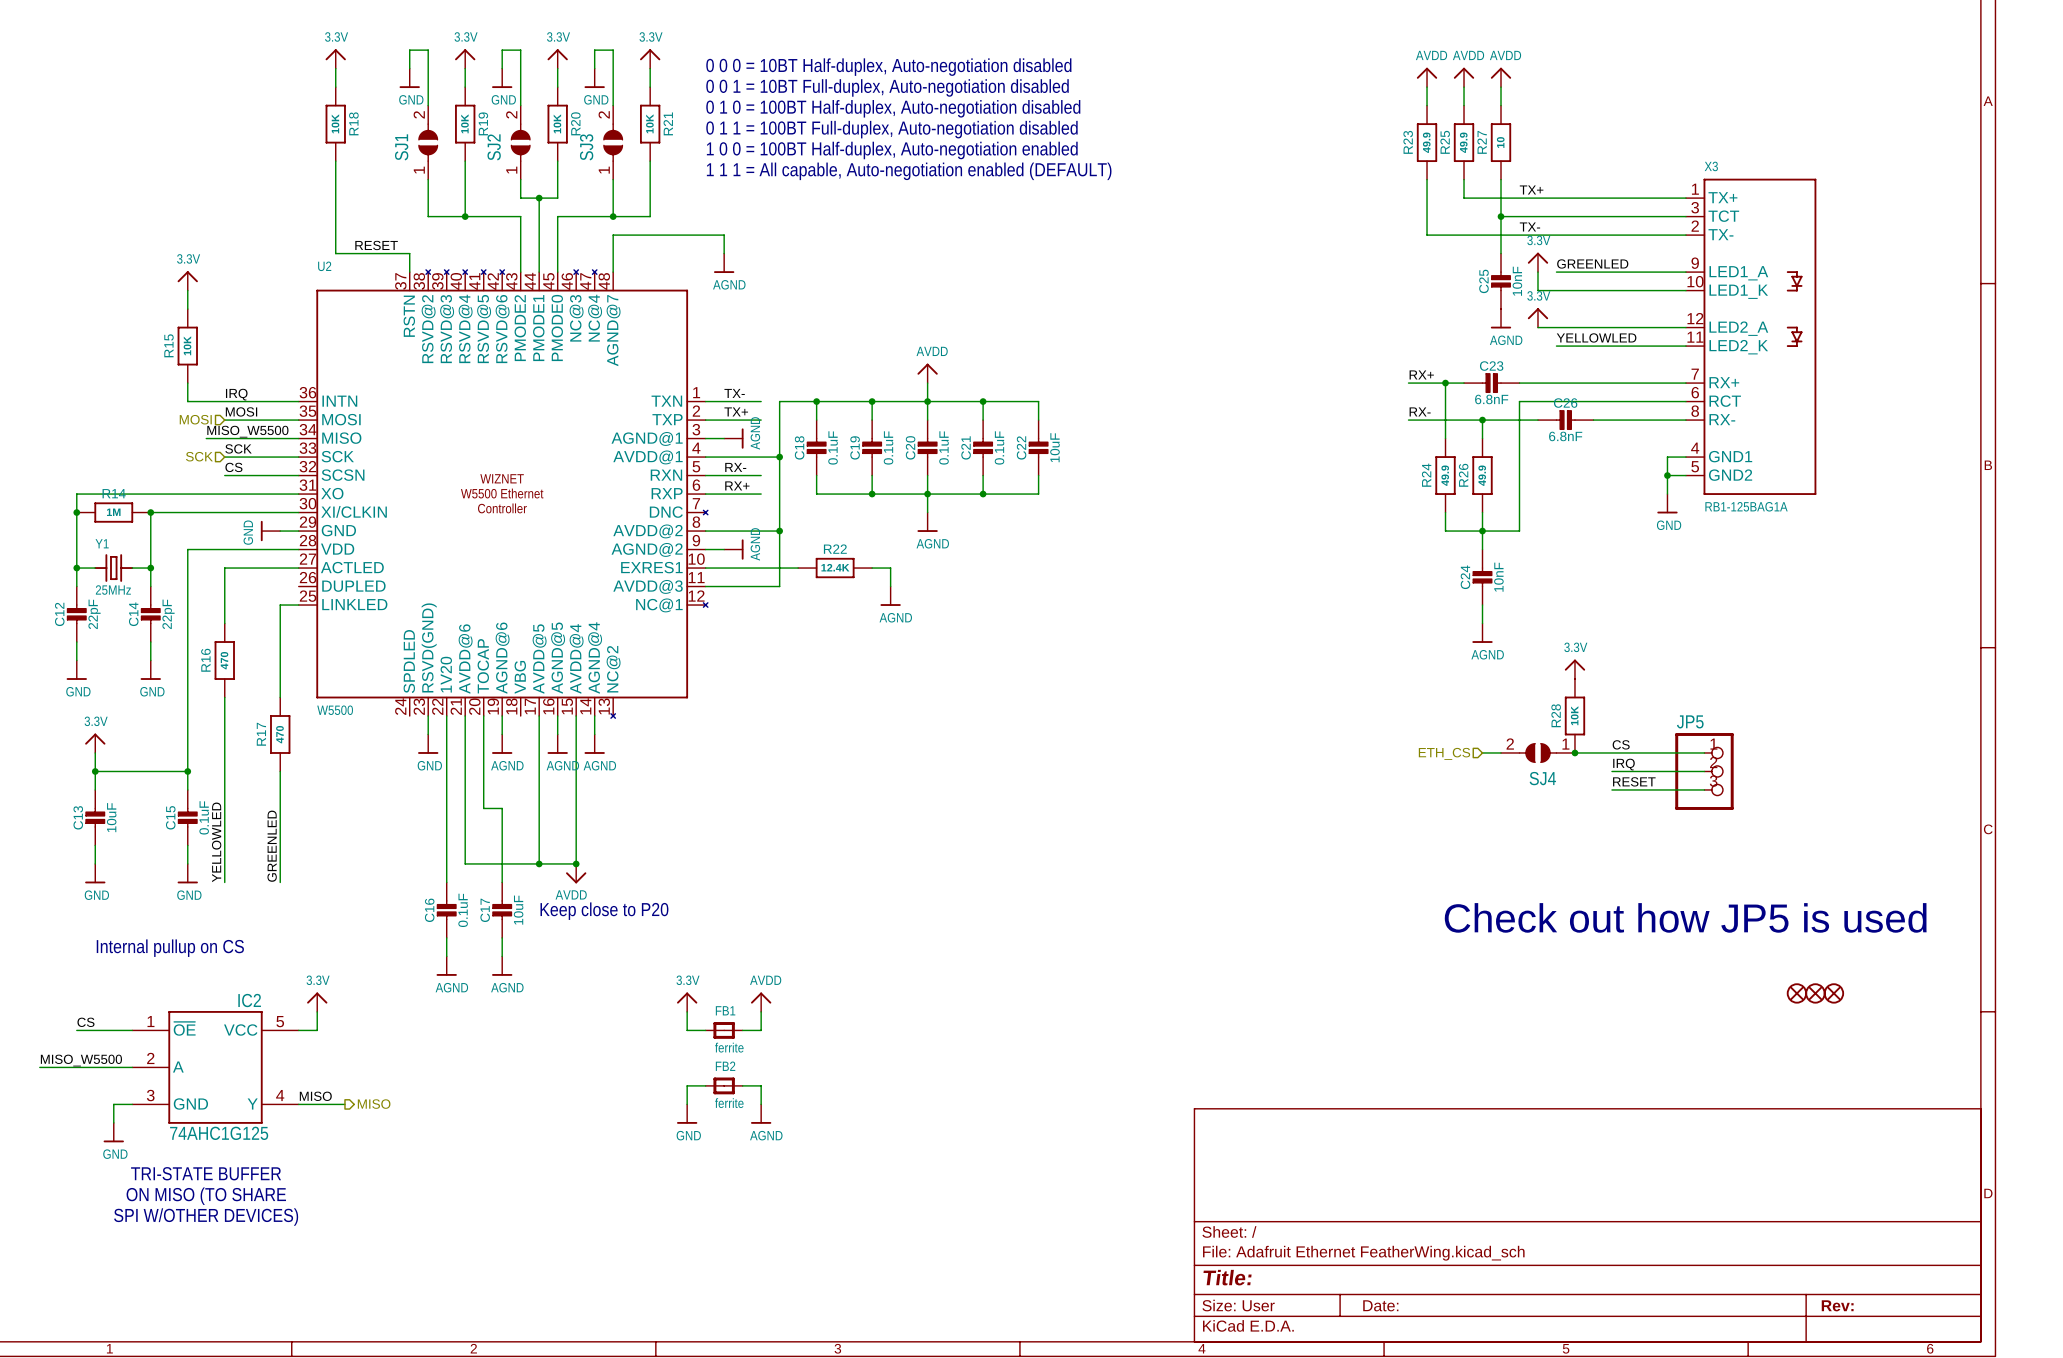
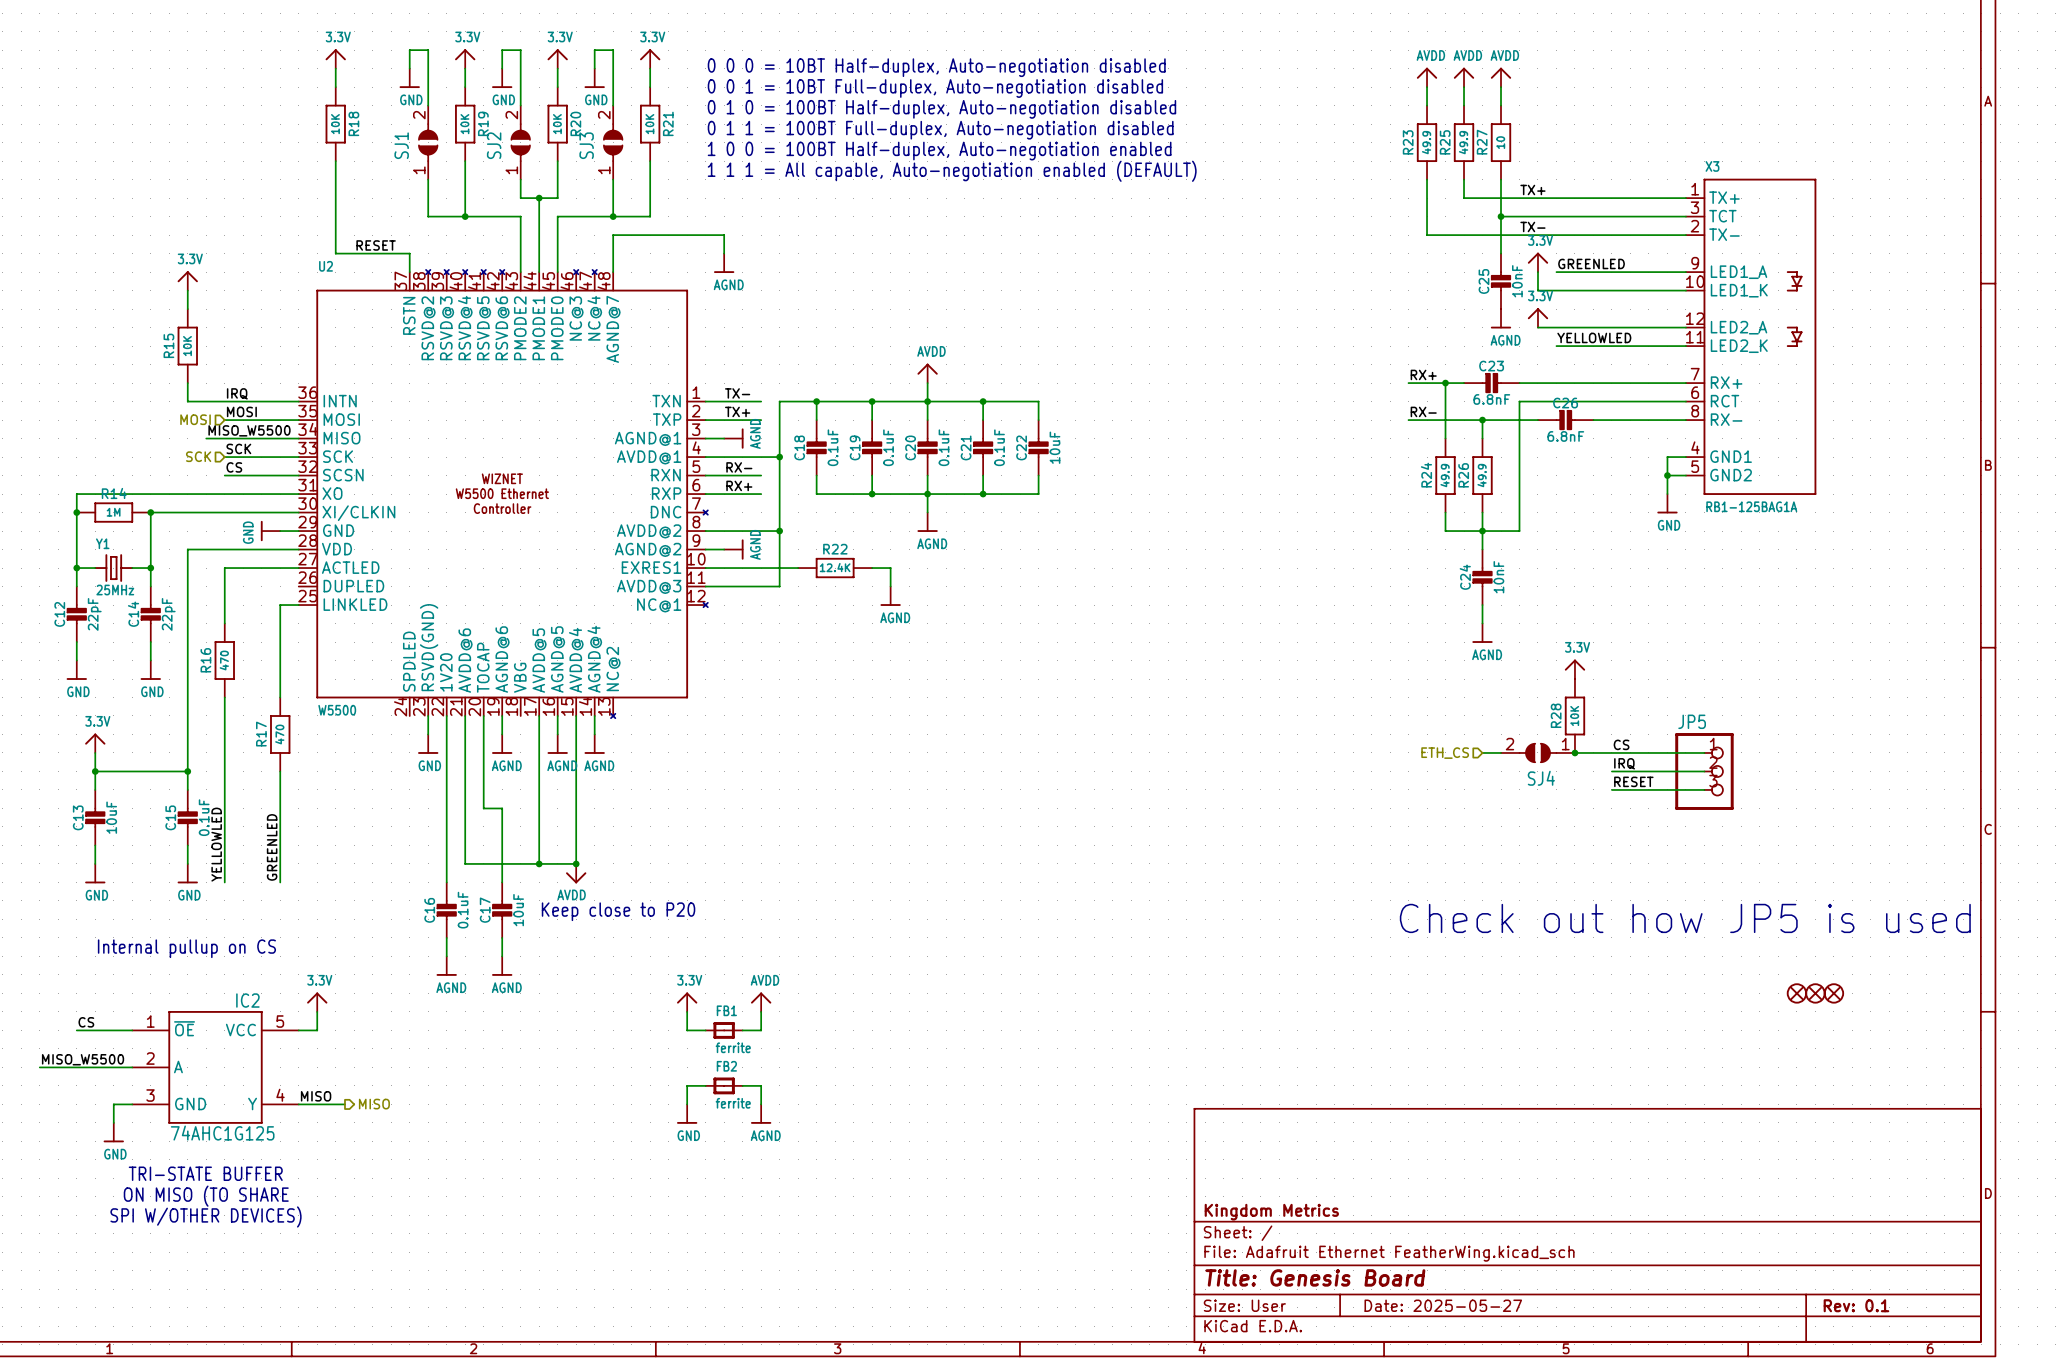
title block: none -> Kingdom Metrics (1271, 1212)
title block: Title: (1227, 1277) -> Title: Genesis Board (1315, 1277)
title block: Date: (1380, 1305) -> Date: 2025-05-27 (1443, 1305)
title block: Rev: (1837, 1305) -> Rev: 0.1 (1856, 1305)

